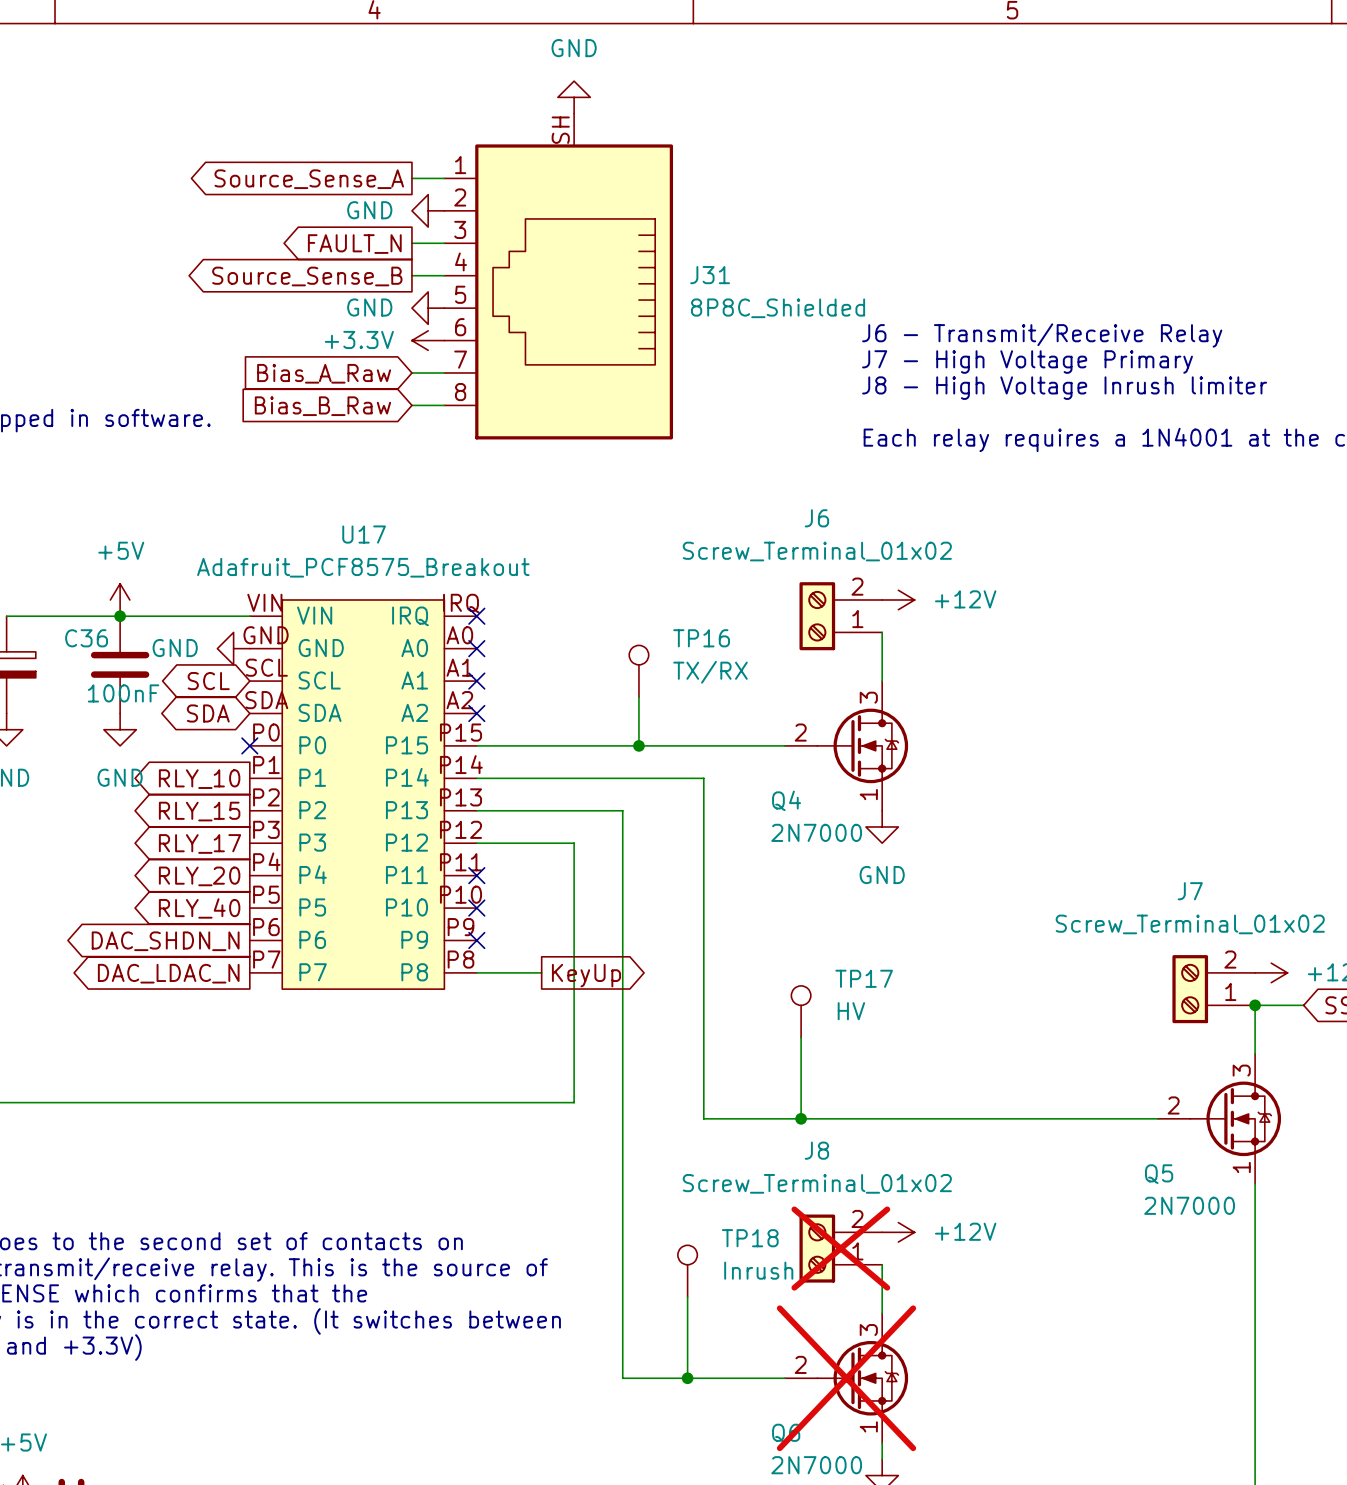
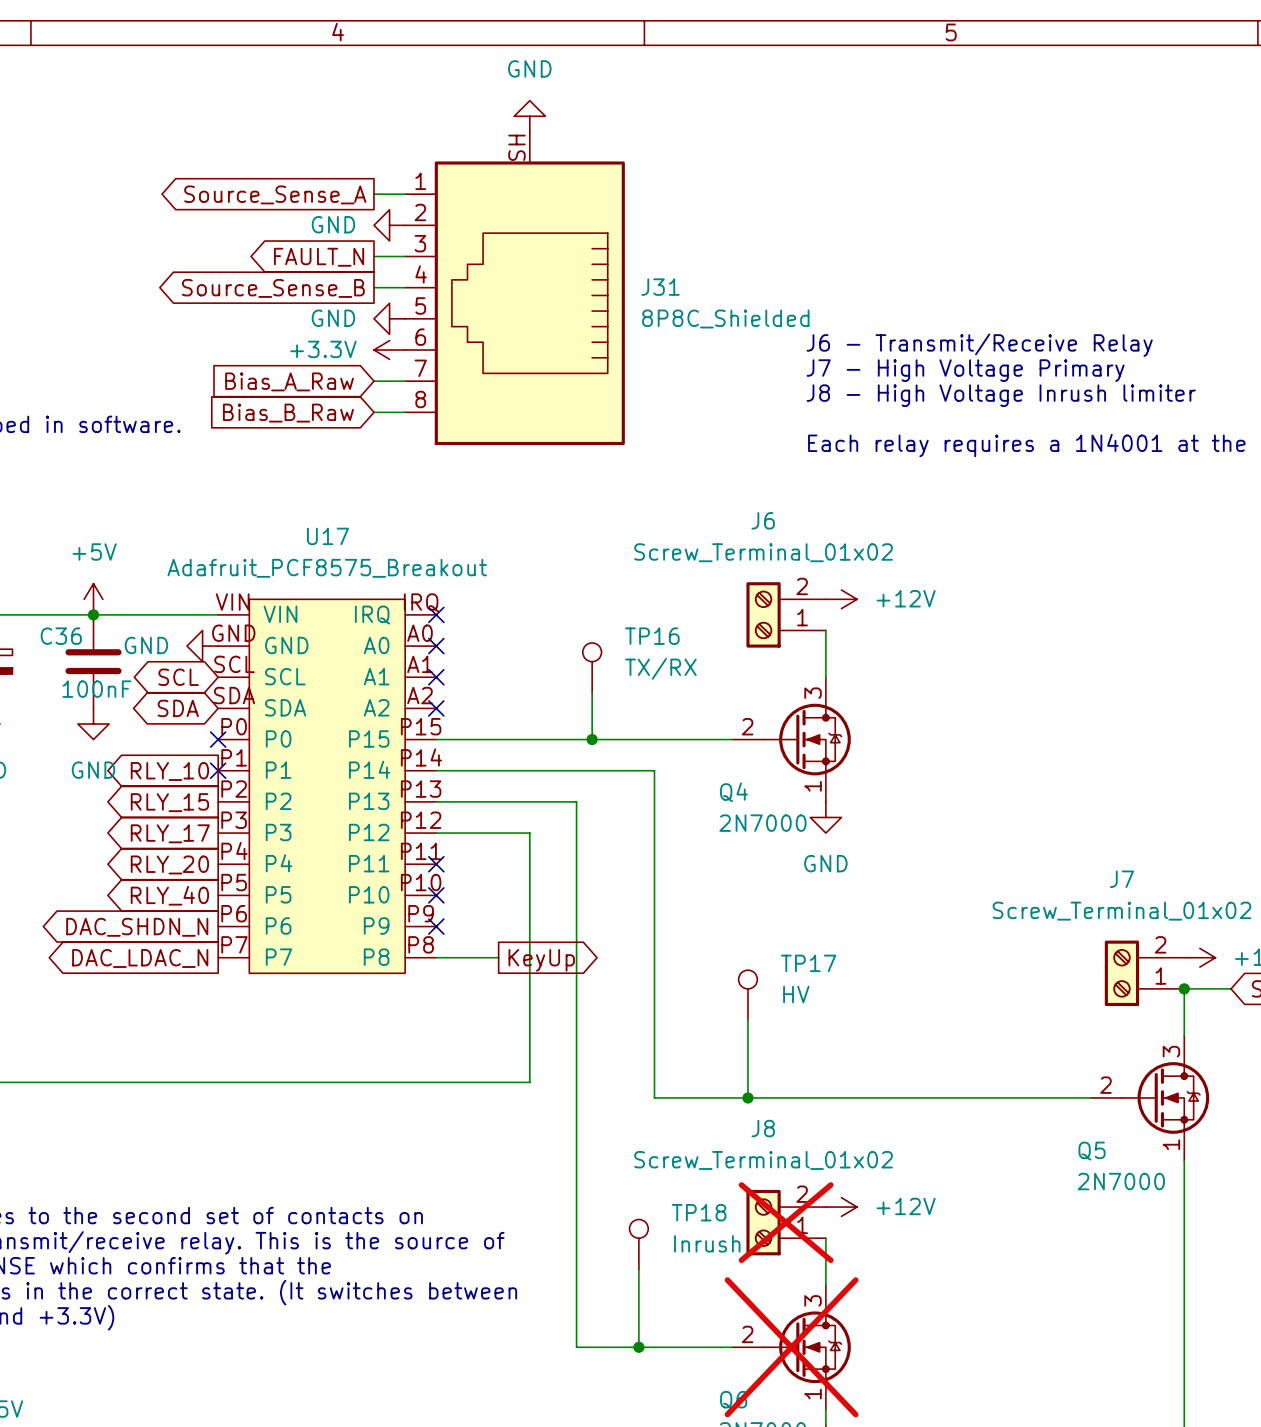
no-connect mark: none -> (218, 770)

